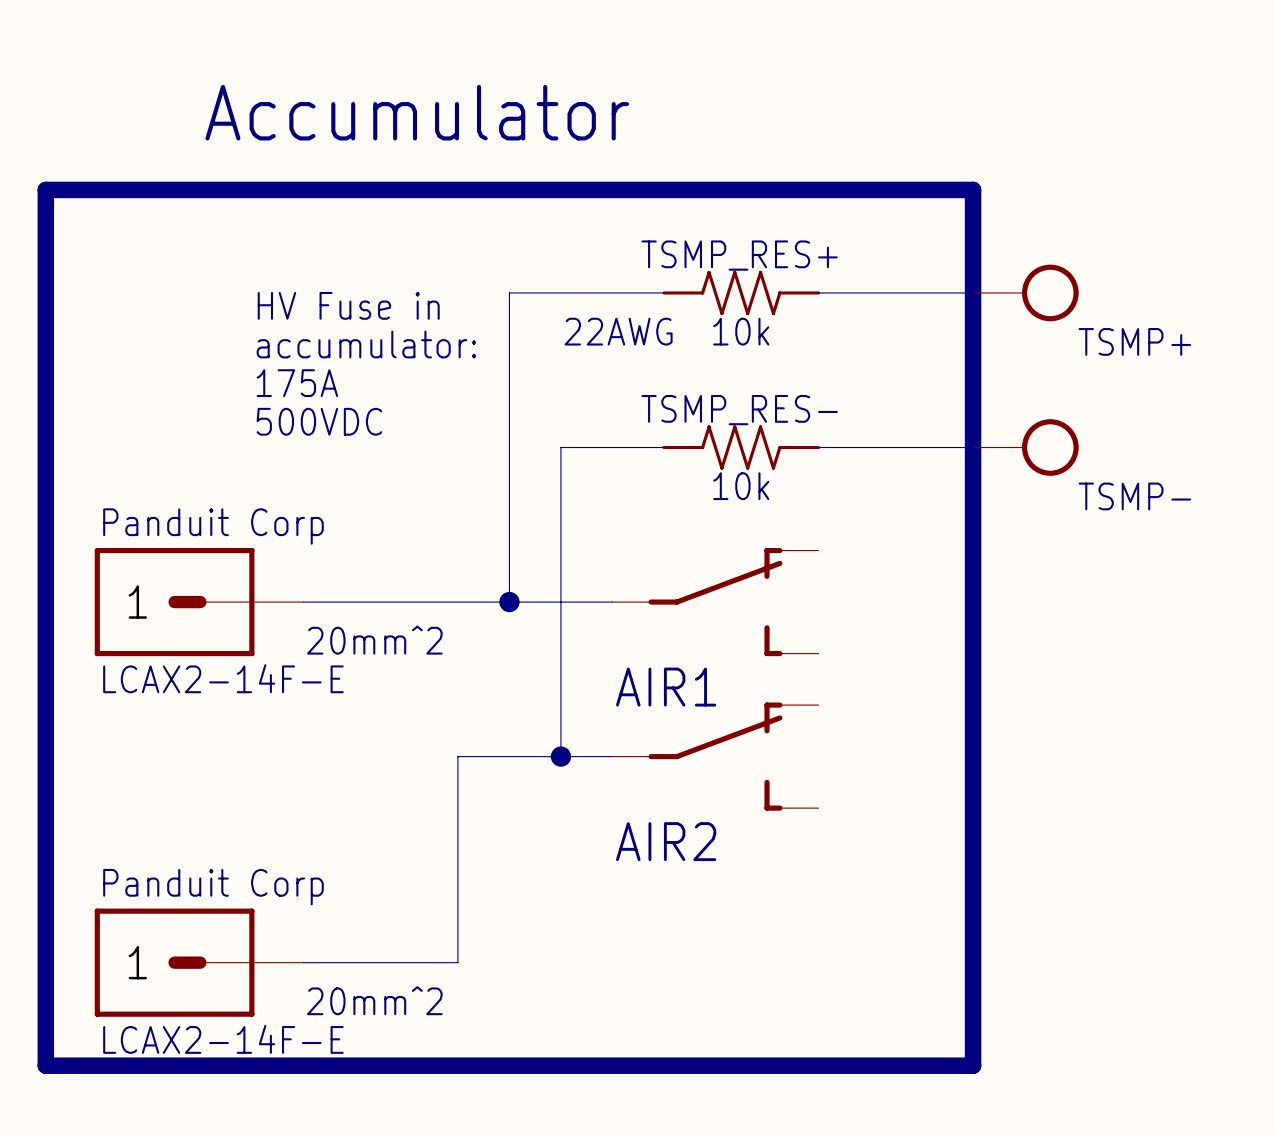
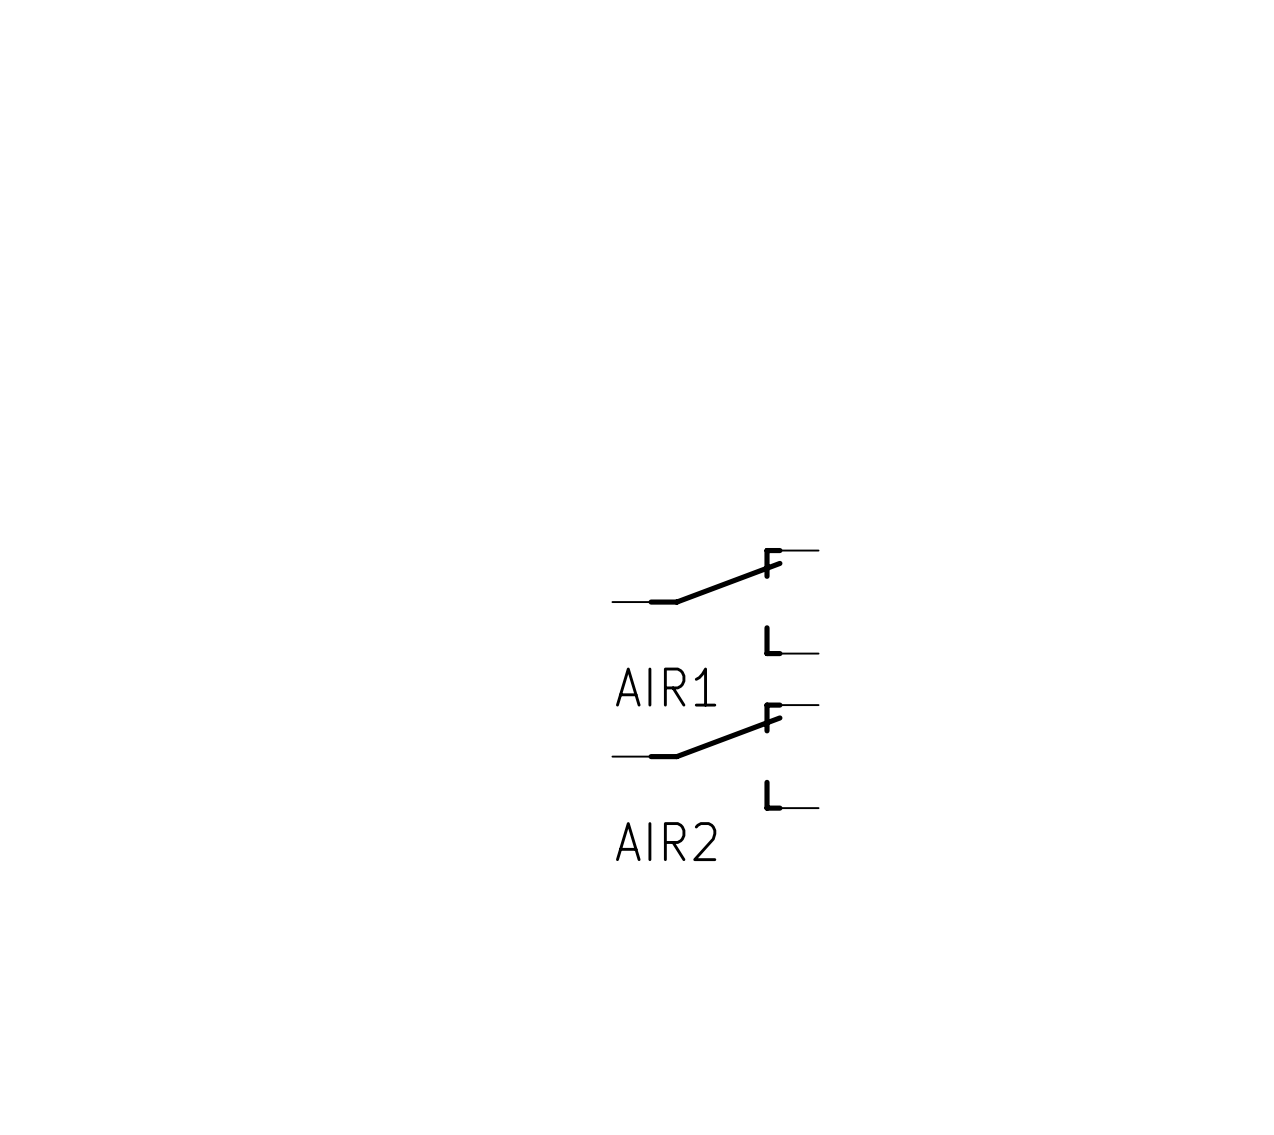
text: Accumulator (417, 112) -> none
line: (45, 189) (45, 1065) (973, 1065) (973, 189) (45, 189) -> none
wire: (663, 292) (509, 292) (509, 602) -> none
TSMP_RES+: 10k (741, 292) -> none
wire: (818, 292) (973, 292) -> none
TSMP+: (1025, 292) -> none
text: HV Fuse in (348, 305) -> none
text: 22AWG (618, 331) -> none
text: accumulator: (366, 344) -> none
text: 175A (297, 383) -> none
text: 500VDC (319, 421) -> none
wire: (663, 447) (560, 447) (560, 756) -> none
TSMP_RES-: 10k (741, 447) -> none
wire: (818, 447) (973, 447) -> none
TSMP-: (1025, 447) -> none
part: (199, 602) -> none
wire: (303, 602) (612, 602) -> none
junction: (509, 602) -> none
text: 20mm^2 (374, 640) -> none
junction: (560, 756) -> none
wire: (612, 756) (457, 756) (457, 962) (303, 962) -> none
part: (199, 962) -> none
text: 20mm^2 (374, 1000) -> none

